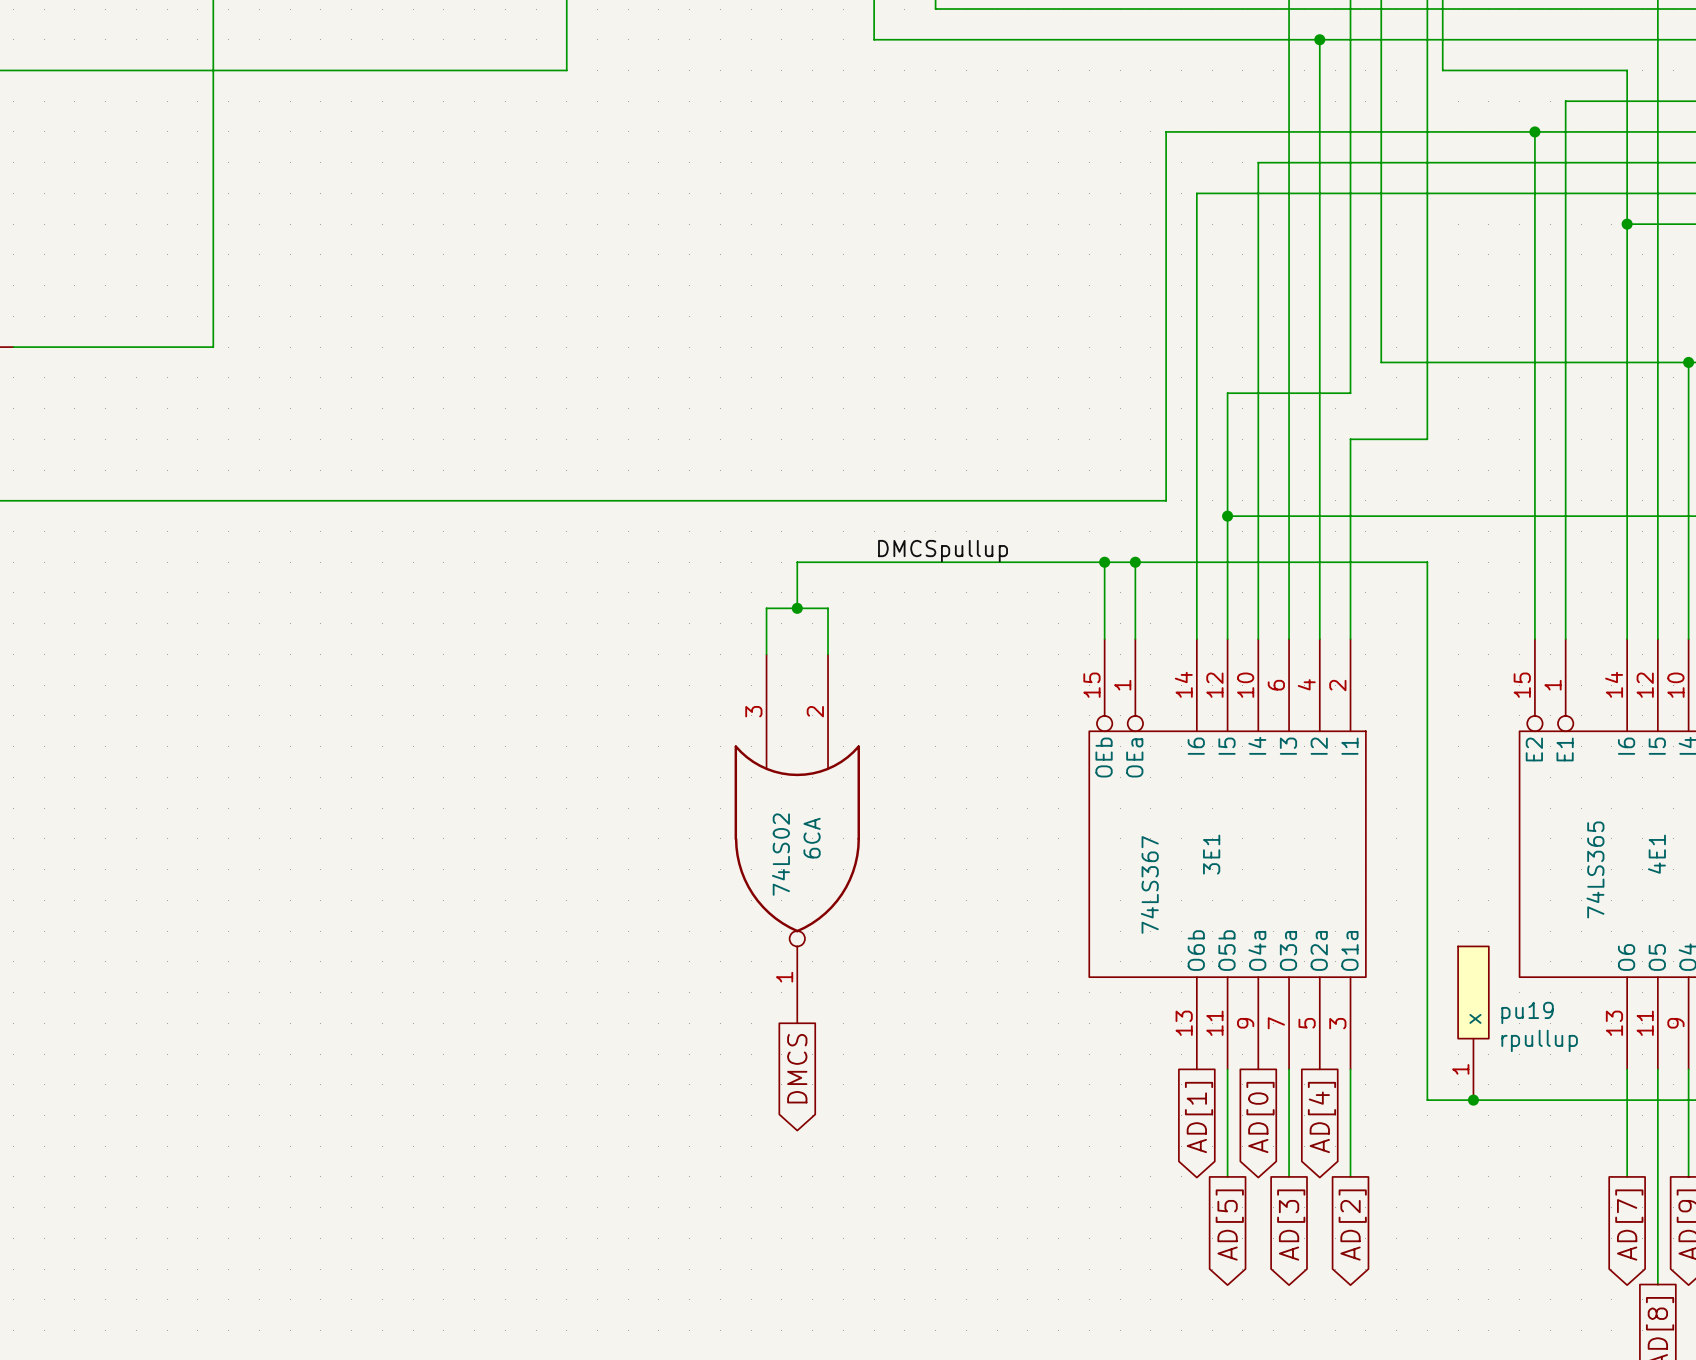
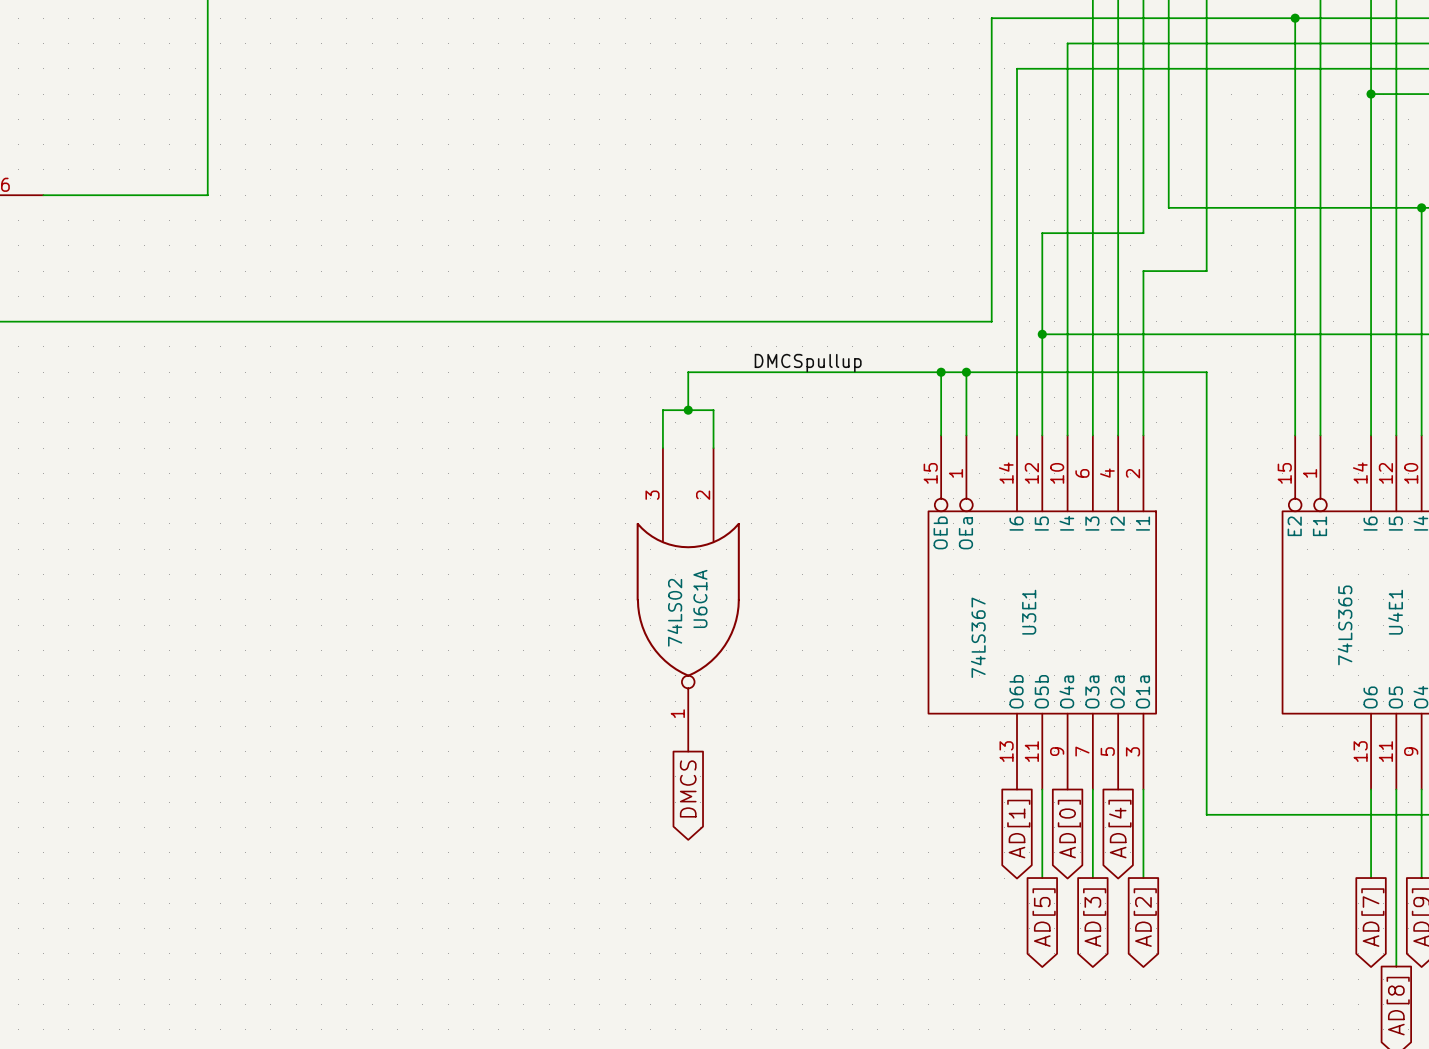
6CA name: 6CA (812, 838) -> U6C1A (700, 598)
3E1 name: 3E1 (1211, 854) -> U3E1 (1029, 612)
4E1 name: 4E1 (1656, 854) -> U4E1 (1395, 612)
pu19: rpullup (1473, 1023) -> none
junction: (1473, 1100) -> none

